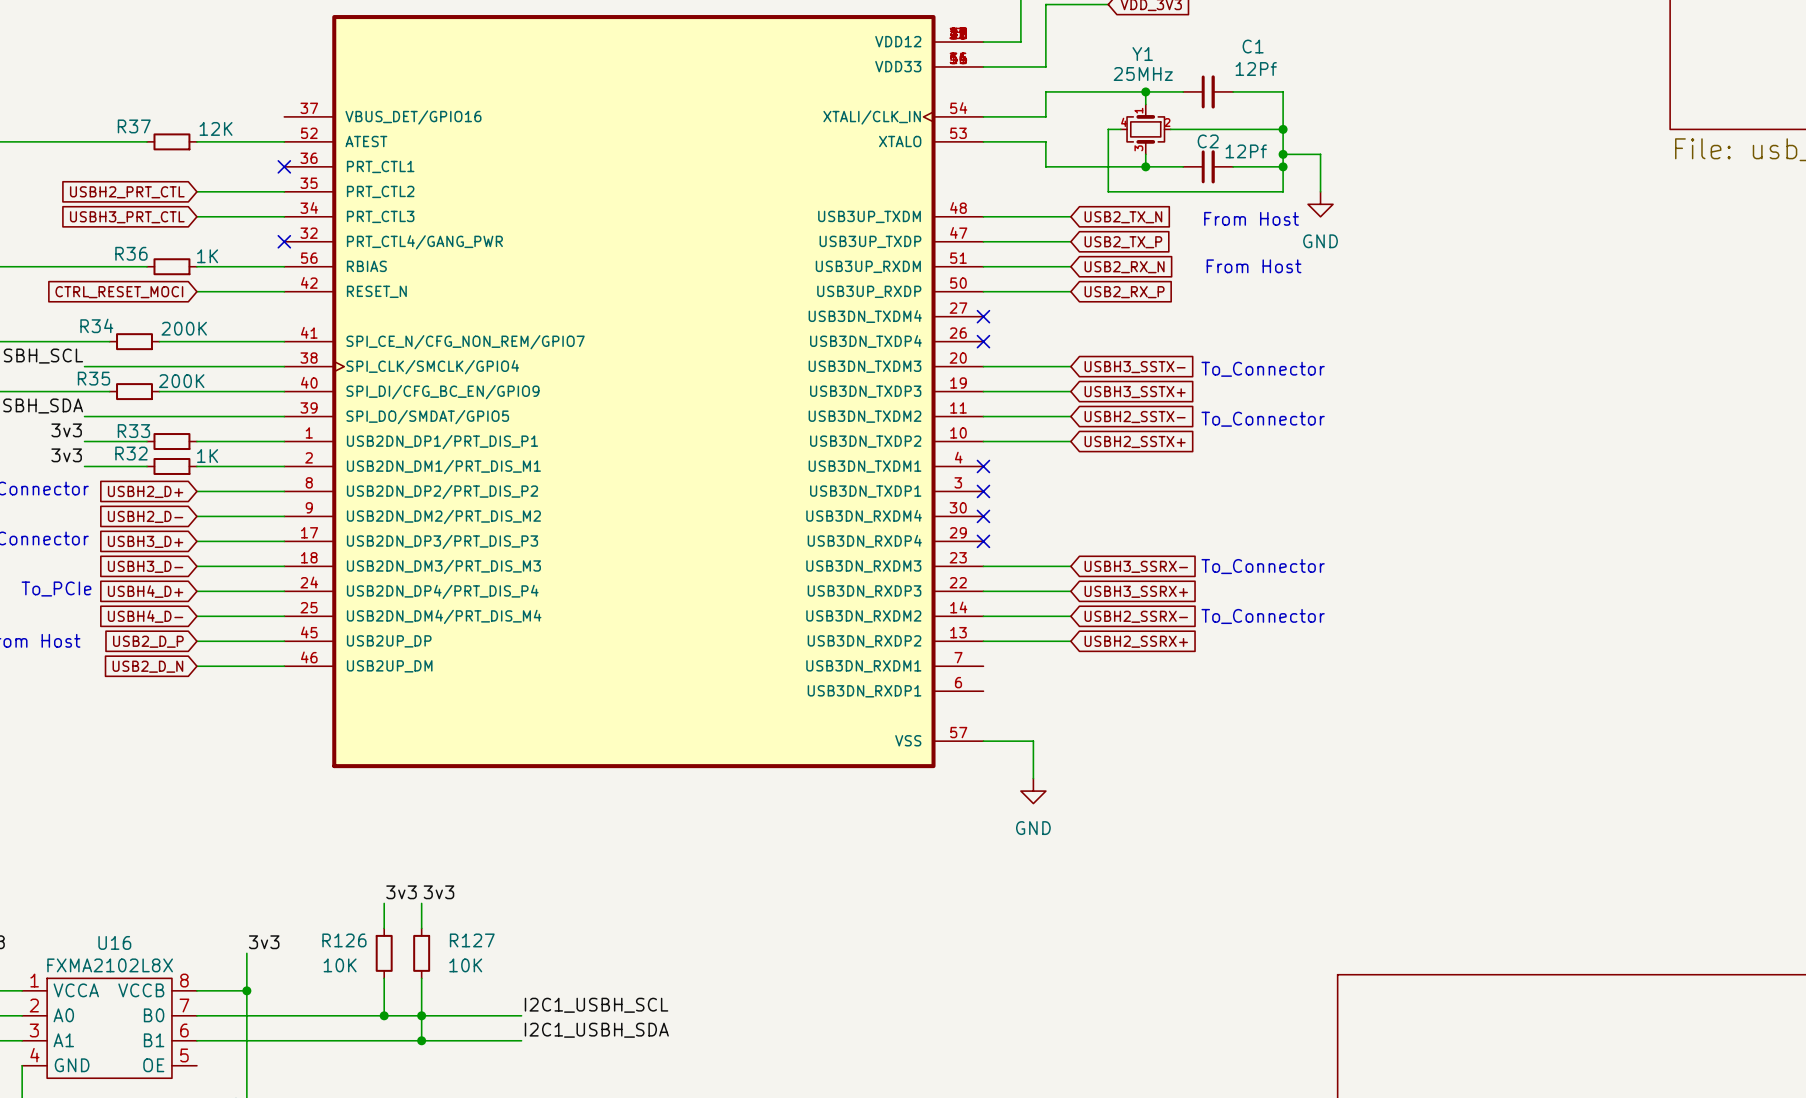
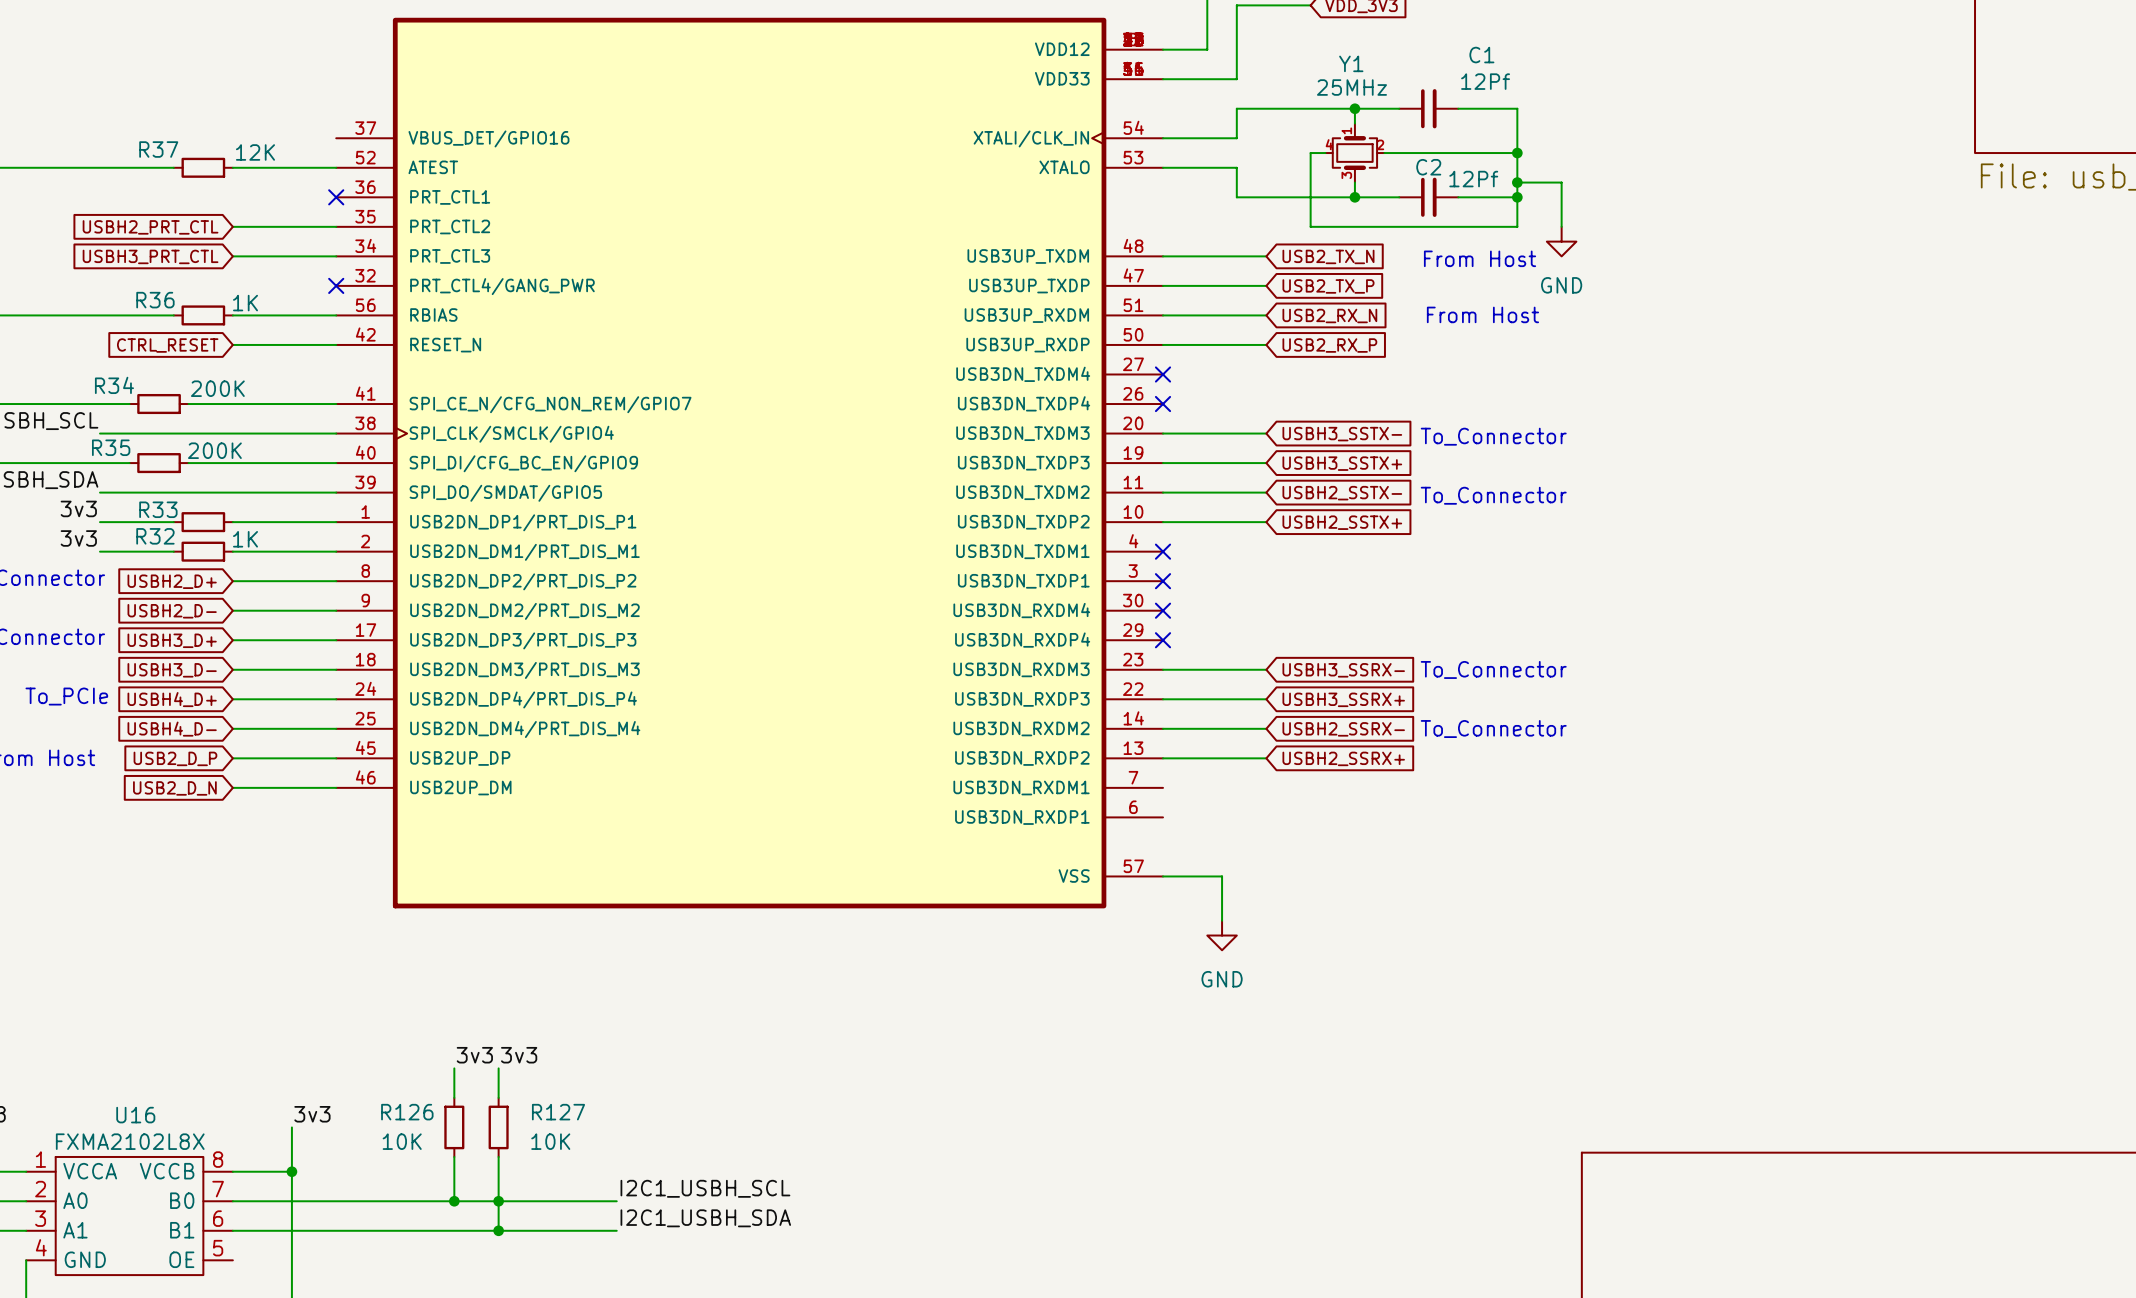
global label: CTRL_RESET_MOCI (119, 292) -> CTRL_RESET (167, 345)

